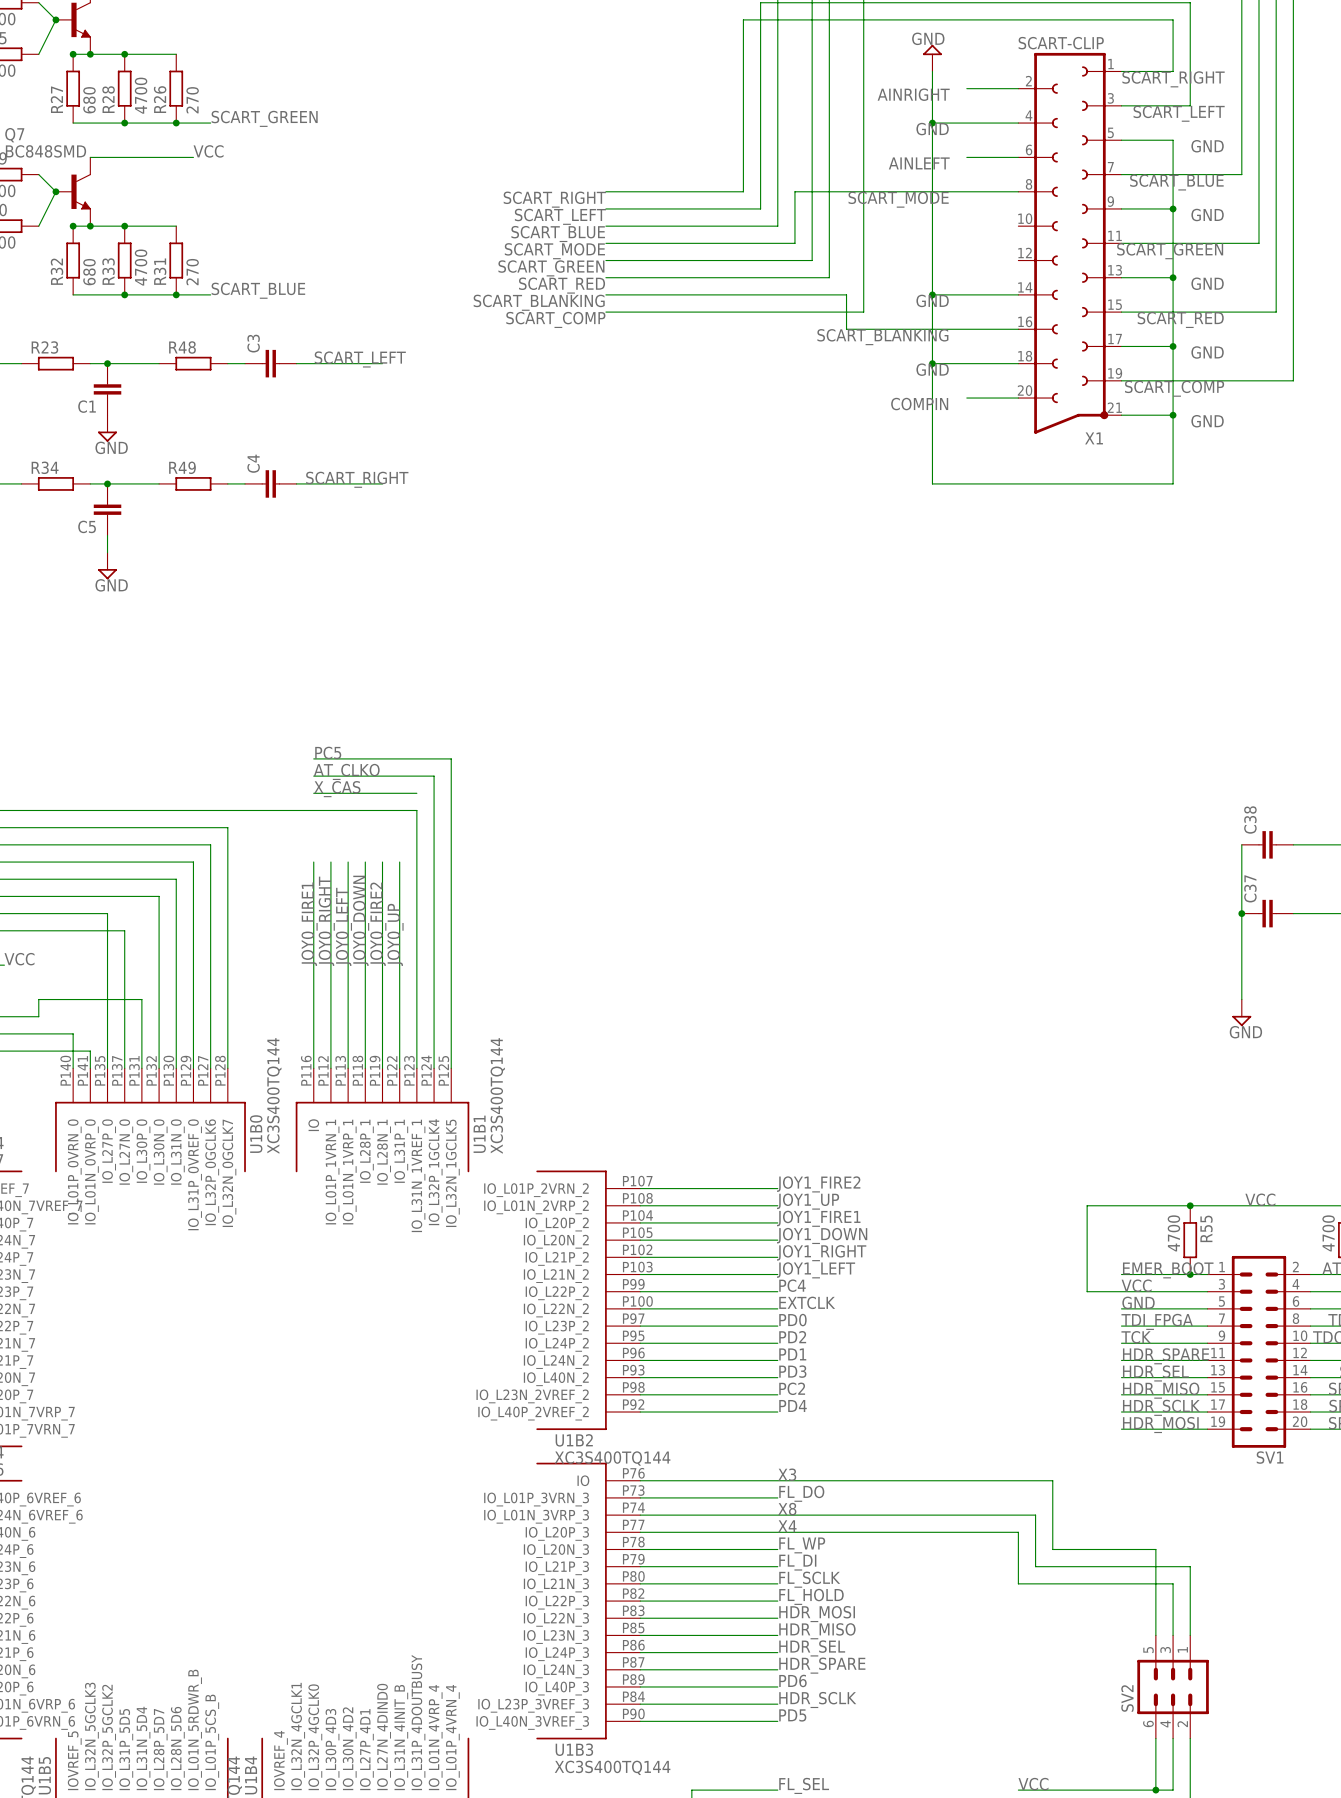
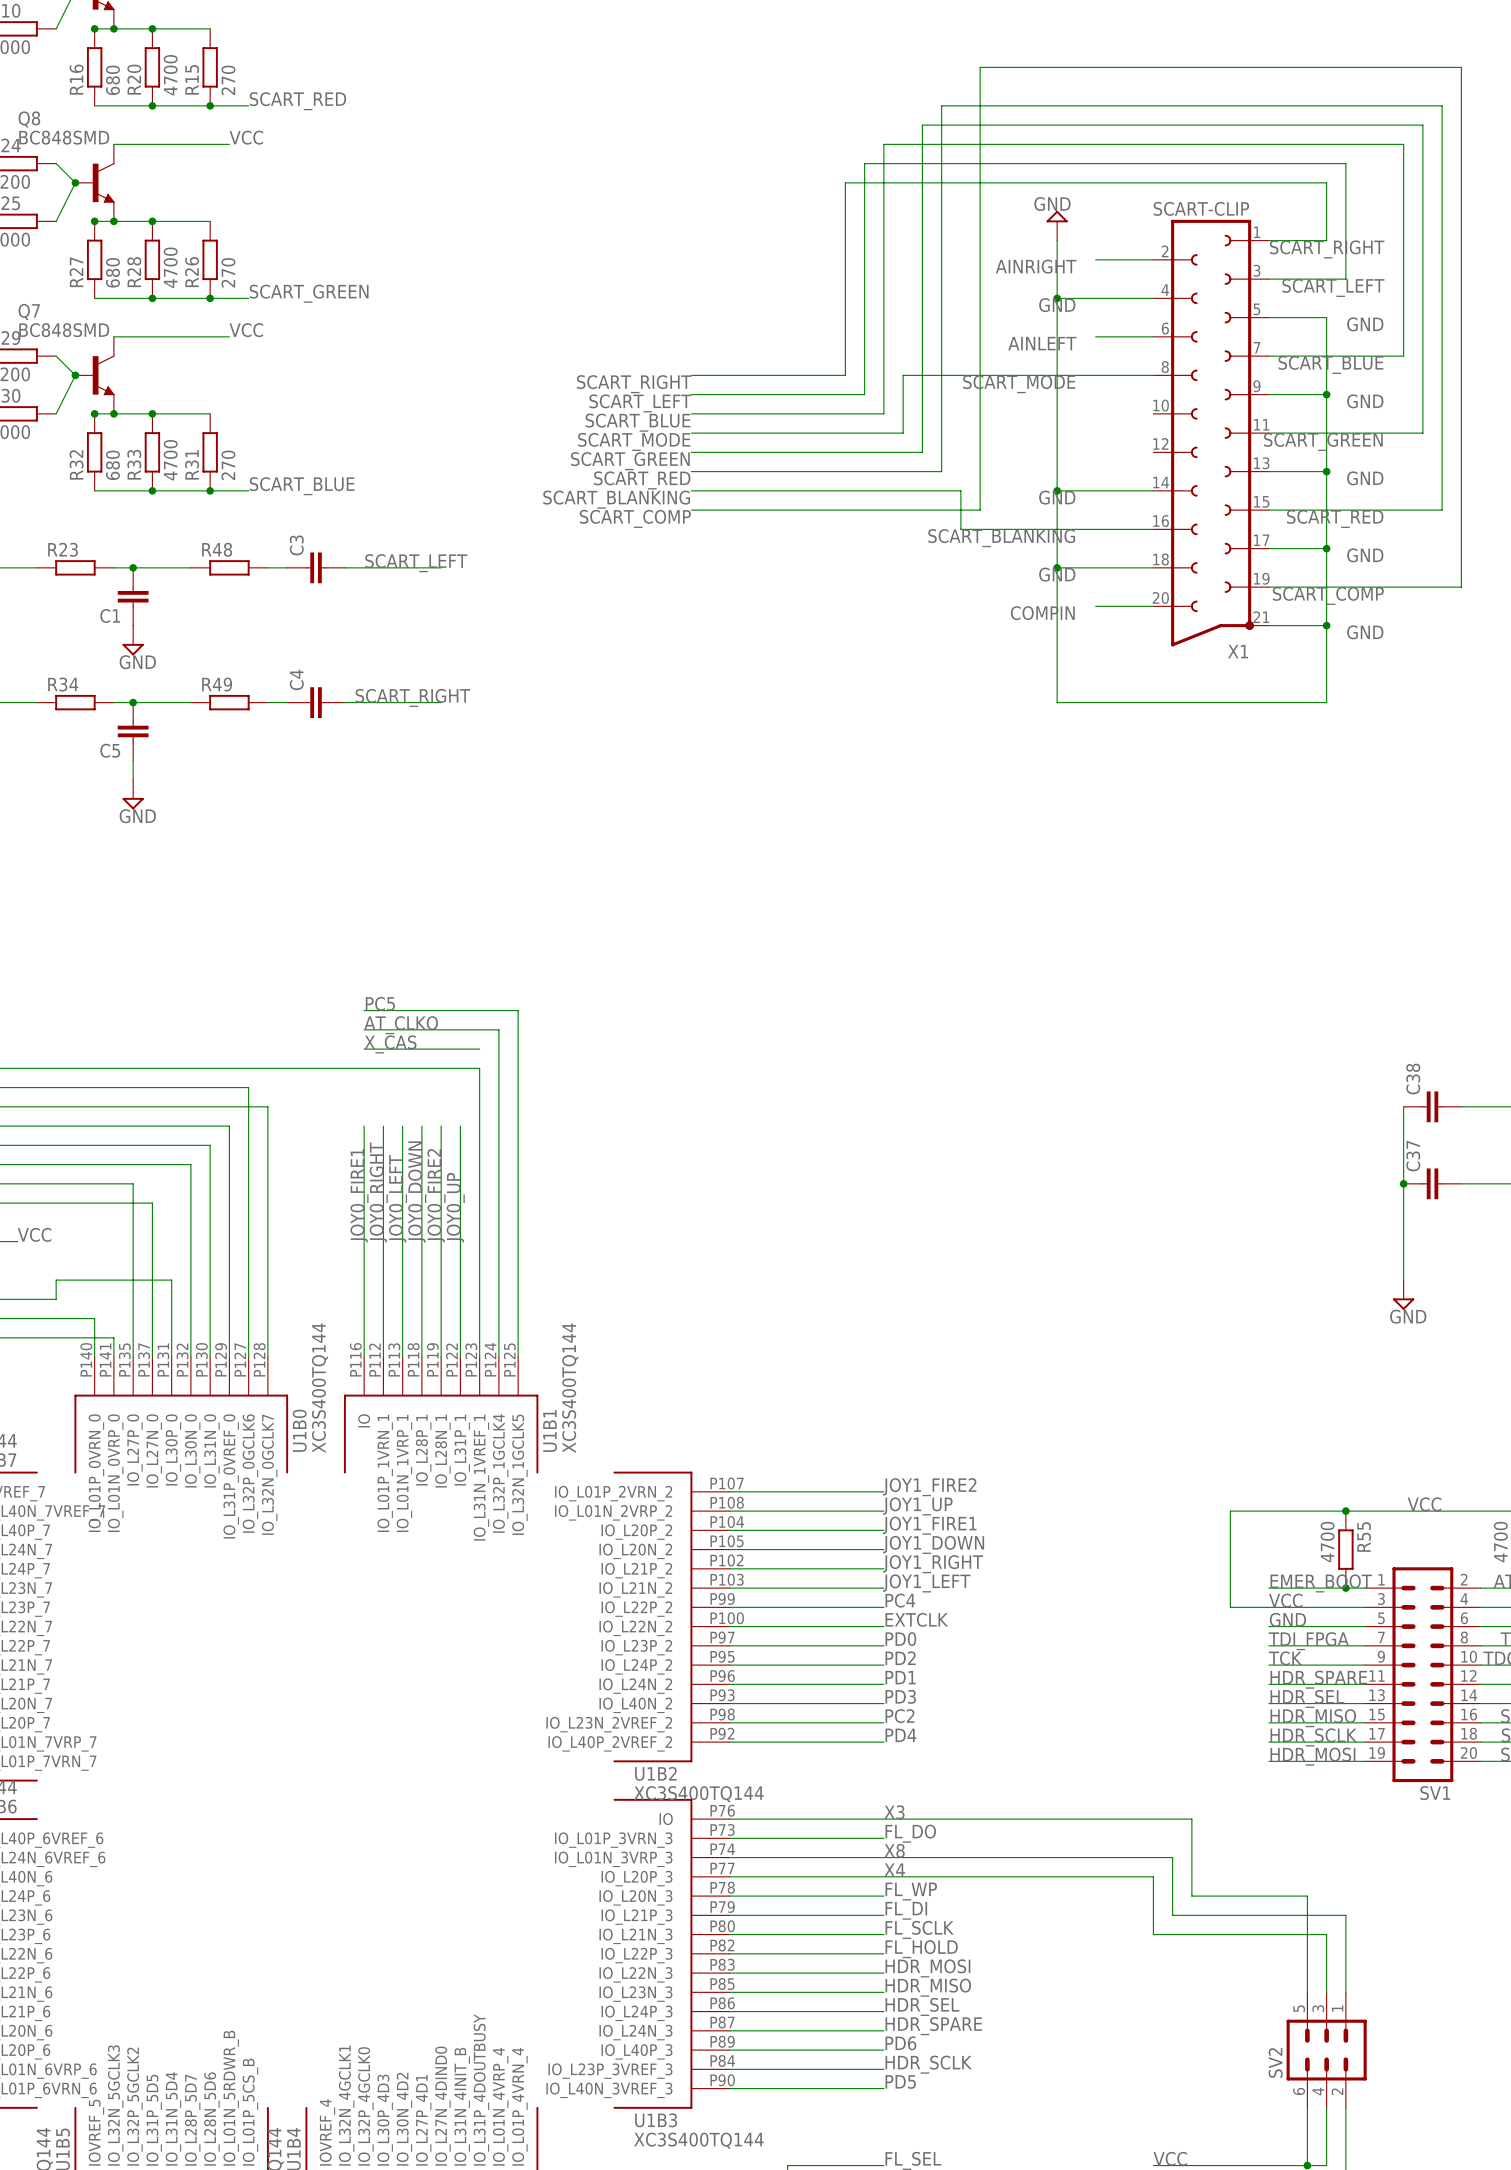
wire: (210, 827) (227, 827) (227, 844) -> (248, 1087) (248, 1106) (267, 1106)

